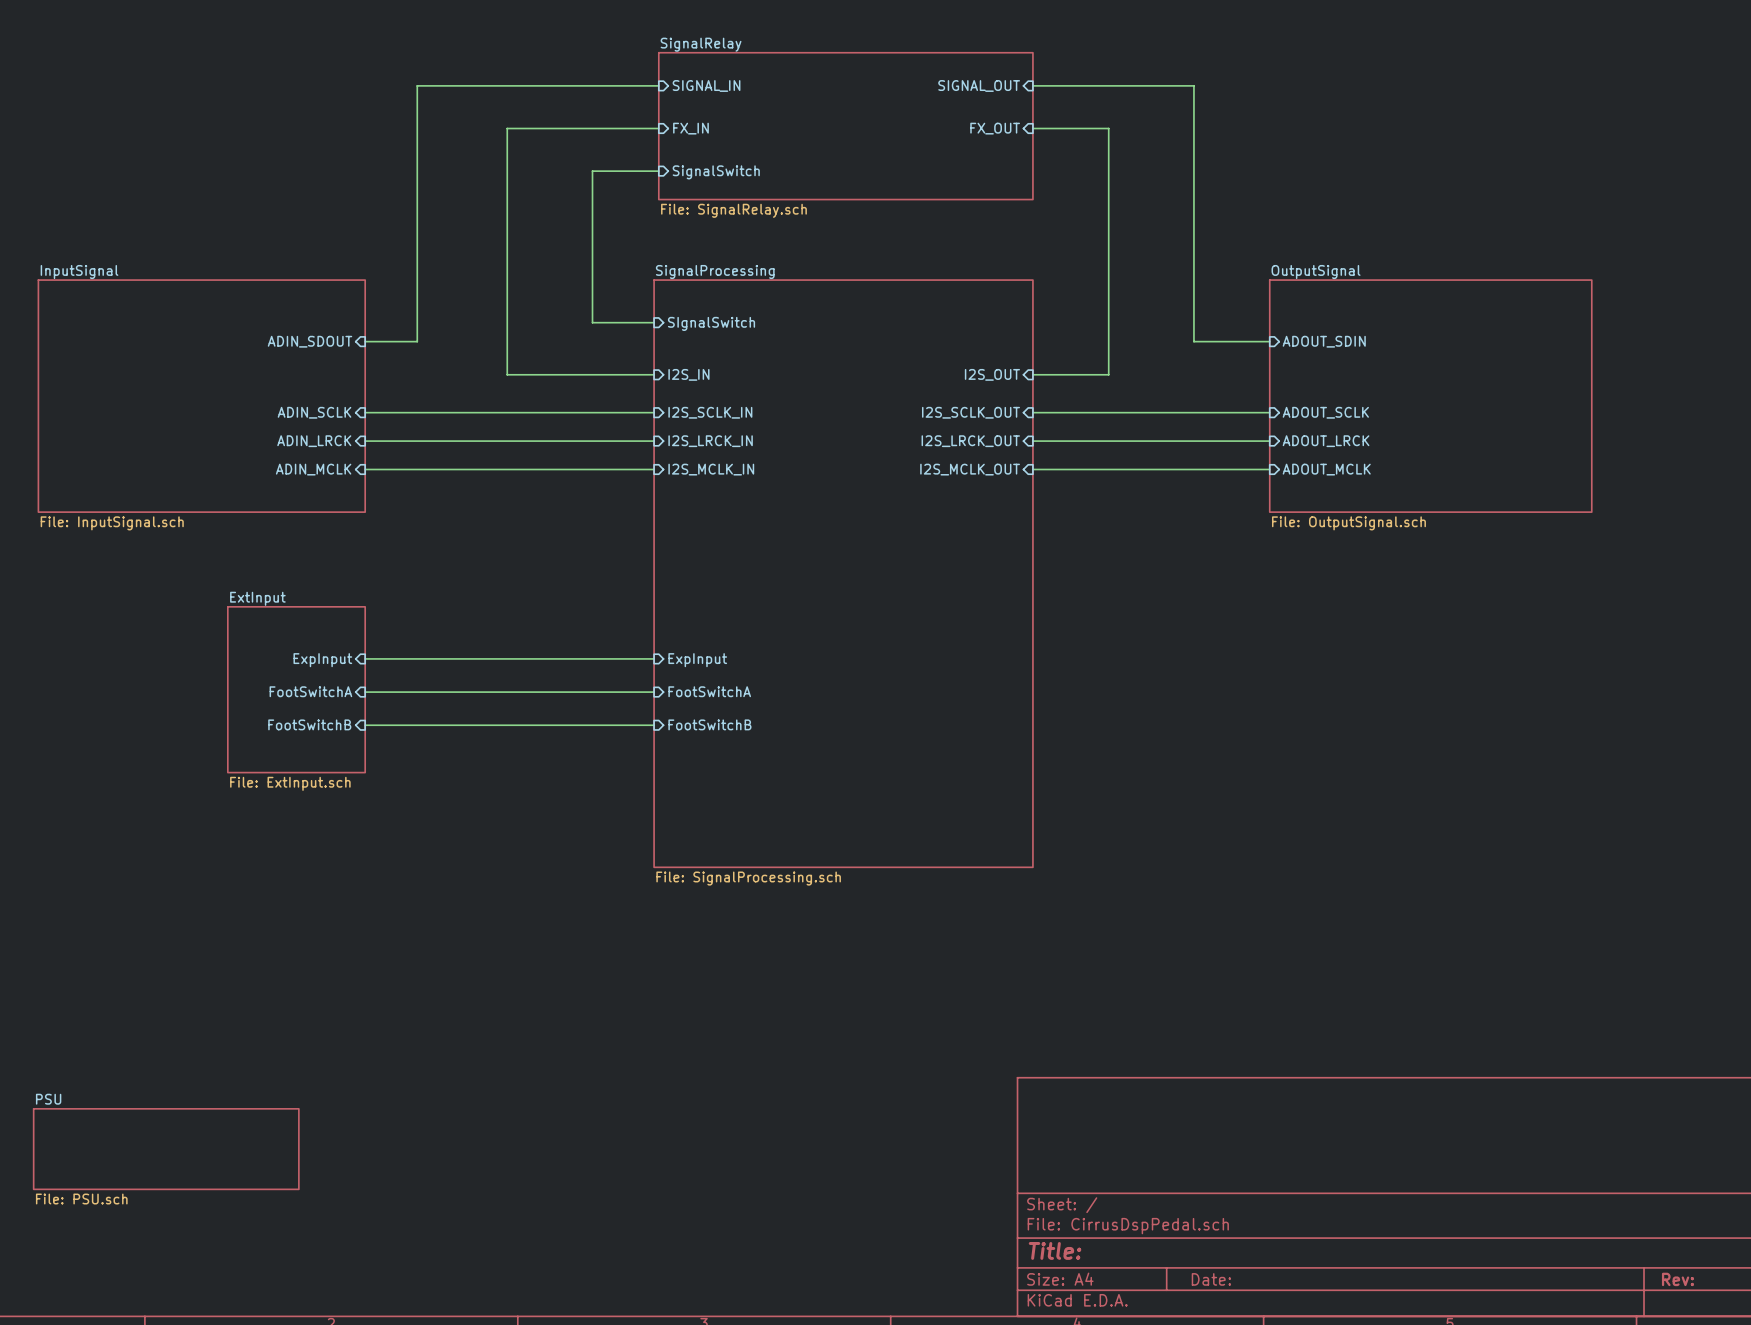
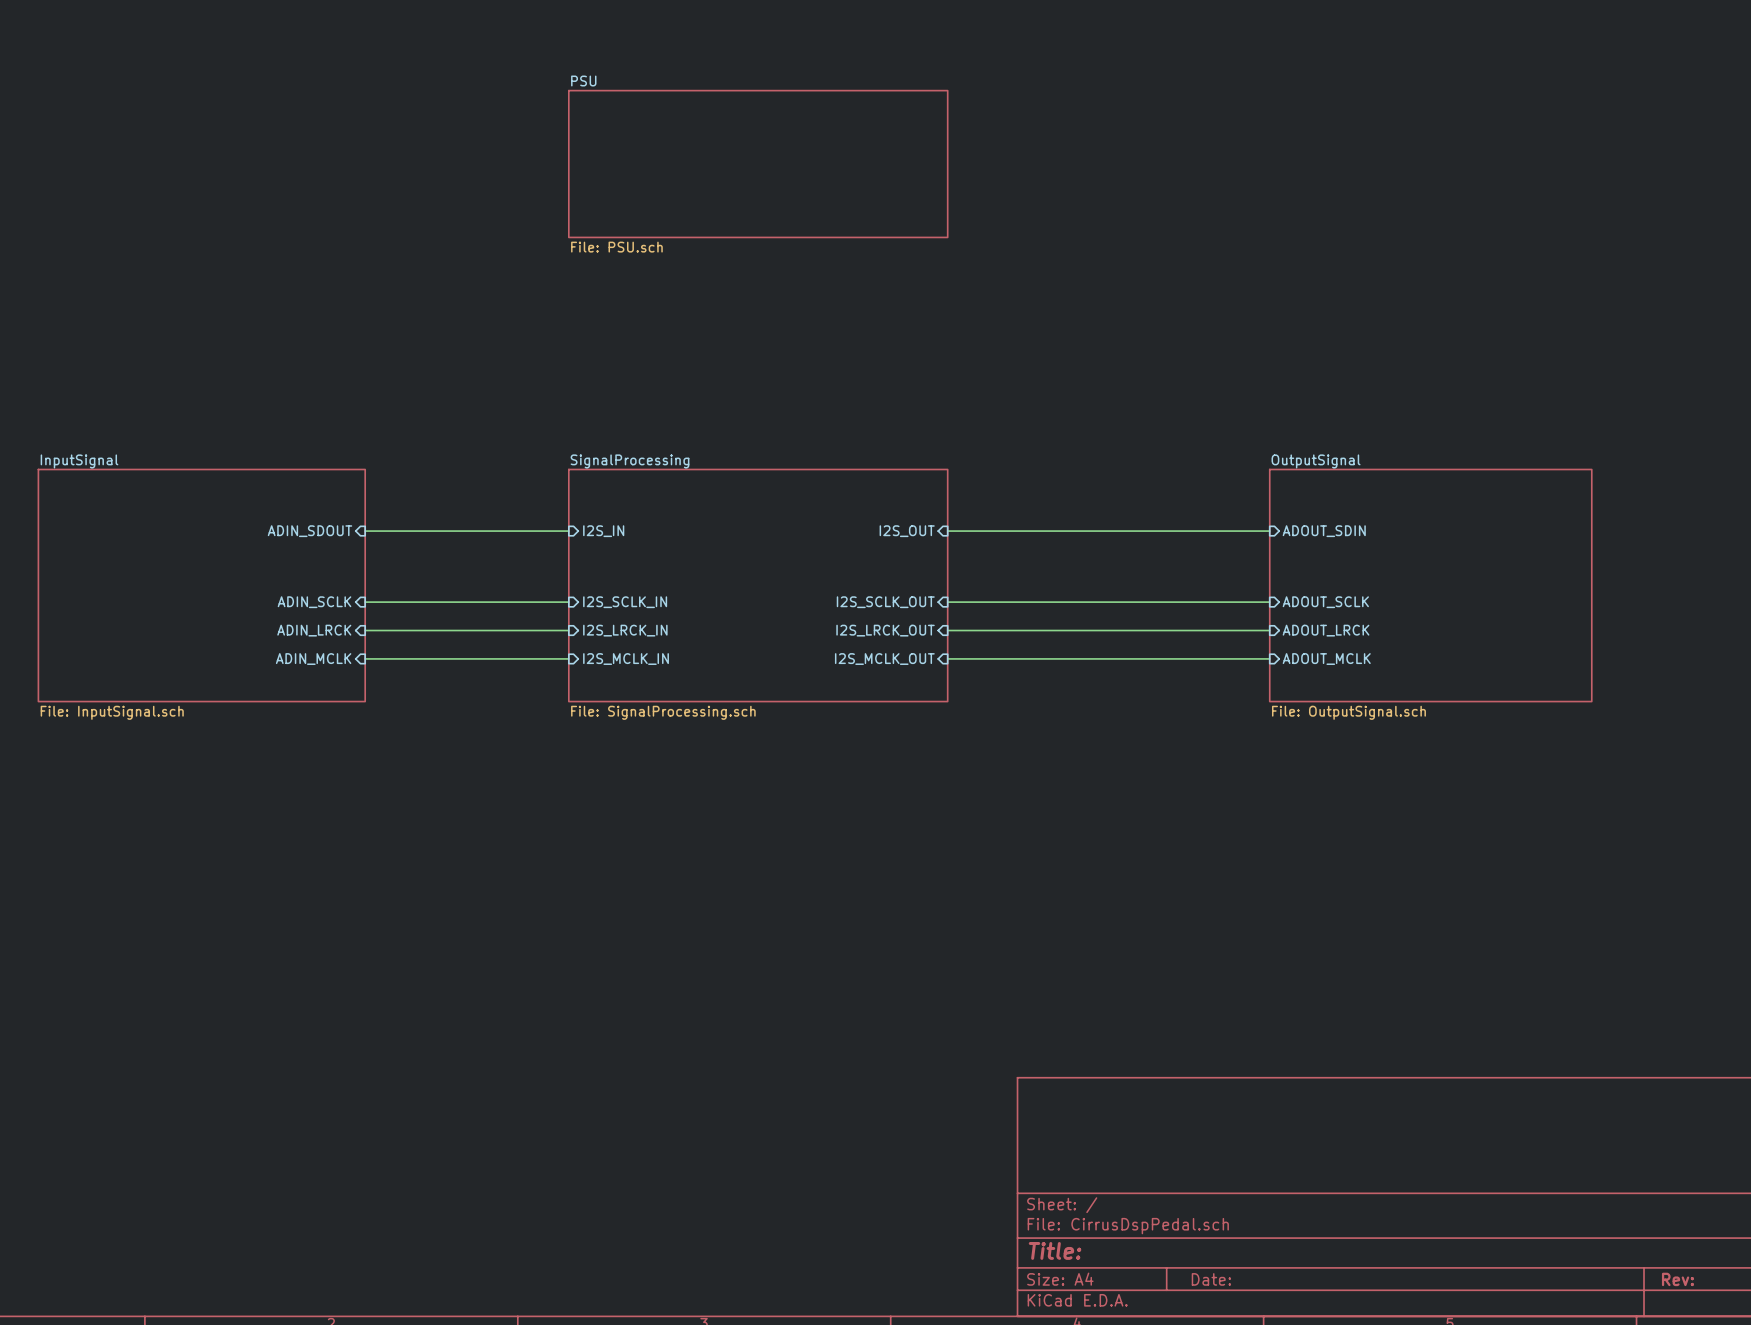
wire: (658, 85) (417, 85) (417, 341) (365, 341) -> none
sheet pin: SIGNAL_IN (706, 85) -> none
sheet pin: SIGNAL_OUT (979, 85) -> none
wire: (1032, 85) (1193, 85) (1193, 341) (1269, 341) -> none
sheet SignalRelay: File: SignalRelay.sch (845, 126) -> none
wire: (658, 128) (507, 128) (507, 374) (654, 374) -> none
sheet pin: FX_IN (690, 128) -> none
sheet pin: FX_OUT (995, 128) -> none
wire: (1032, 128) (1108, 128) (1108, 374) (1032, 374) -> none
sheet PSU: none -> File: PSU.sch (758, 164)
wire: (658, 171) (592, 171) (592, 322) (654, 322) -> none
sheet pin: SignalSwitch (716, 172) -> none
sheet pin: SIgnalSwitch (711, 323) -> none
sheet pin: ADIN_SDOUT (310, 341) -> none
sheet pin: ADOUT_SDIN (1324, 341) -> none
sheet pin position: I2S_IN (688, 374) -> I2S_IN (603, 531)
sheet pin position: I2S_OUT (992, 374) -> I2S_OUT (907, 531)
sheet InputSignal: File: InputSignal.sch (201, 396) -> none
sheet OutputSignal: File: OutputSignal.sch (1430, 396) -> none
sheet pin: ADIN_SCLK (314, 412) -> none
wire: (365, 412) (654, 412) -> none
sheet pin: I2S_SCLK_IN (710, 412) -> none
sheet pin: I2S_SCLK_OUT (971, 412) -> none
wire: (1032, 412) (1269, 412) -> none
sheet pin: ADOUT_SCLK (1325, 412) -> none
sheet pin: ADIN_LRCK (314, 441) -> none
wire: (365, 441) (654, 441) -> none
sheet pin: I2S_LRCK_IN (710, 441) -> none
sheet pin: I2S_LRCK_OUT (970, 441) -> none
wire: (1032, 441) (1269, 441) -> none
sheet pin: ADOUT_LRCK (1326, 441) -> none
sheet pin: ADIN_MCLK (313, 469) -> none
wire: (365, 469) (654, 469) -> none
sheet pin: I2S_MCLK_IN (711, 469) -> none
sheet pin: I2S_MCLK_OUT (970, 469) -> none
wire: (1032, 469) (1269, 469) -> none
sheet pin: ADOUT_MCLK (1326, 469) -> none
sheet pin: none -> ADIN_SDOUT (310, 531)
wire: none -> (365, 531) (568, 531)
wire: none -> (947, 531) (1269, 531)
sheet pin: none -> ADOUT_SDIN (1324, 531)
sheet SignalProcessing: File: SignalProcessing.sch (843, 573) -> none
sheet InputSignal: none -> File: InputSignal.sch (201, 585)
sheet SignalProcessing: none -> File: SignalProcessing.sch (758, 585)
sheet OutputSignal: none -> File: OutputSignal.sch (1430, 585)
sheet pin: none -> ADIN_SCLK (314, 602)
wire: none -> (365, 602) (568, 602)
sheet pin: none -> I2S_SCLK_IN (625, 602)
sheet pin: none -> I2S_SCLK_OUT (885, 602)
wire: none -> (947, 602) (1269, 602)
sheet pin: none -> ADOUT_SCLK (1325, 602)
sheet pin: none -> ADIN_LRCK (314, 630)
wire: none -> (365, 630) (568, 630)
sheet pin: none -> I2S_LRCK_IN (625, 630)
sheet pin: none -> I2S_LRCK_OUT (885, 630)
wire: none -> (947, 630) (1269, 630)
sheet pin: none -> ADOUT_LRCK (1326, 630)
wire: (568, 658) (654, 658) -> none
wire: none -> (947, 658) (1269, 658)
sheet pin: none -> I2S_MCLK_IN (626, 659)
sheet pin: none -> I2S_MCLK_OUT (884, 659)
sheet pin: none -> ADOUT_MCLK (1326, 659)
sheet pin: ExpInput (322, 660) -> ADIN_MCLK (313, 659)
sheet pin: ExpInput (697, 660) -> none
sheet ExtInput: File: ExtInput.sch (296, 689) -> none
sheet pin: FootSwitchA (310, 691) -> none
sheet pin: FootSwitchA (709, 691) -> none
wire: (365, 692) (654, 692) -> none
sheet pin: FootSwitchB (309, 724) -> none
sheet pin: FootSwitchB (709, 724) -> none
wire: (365, 725) (654, 725) -> none
sheet PSU: File: PSU.sch (166, 1149) -> none

